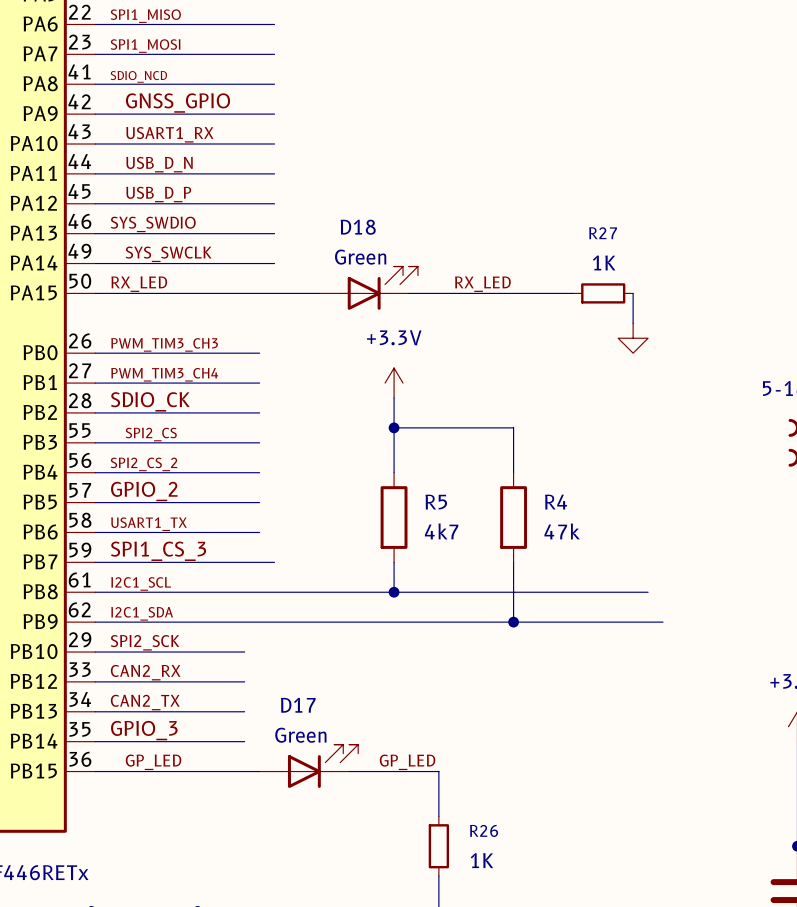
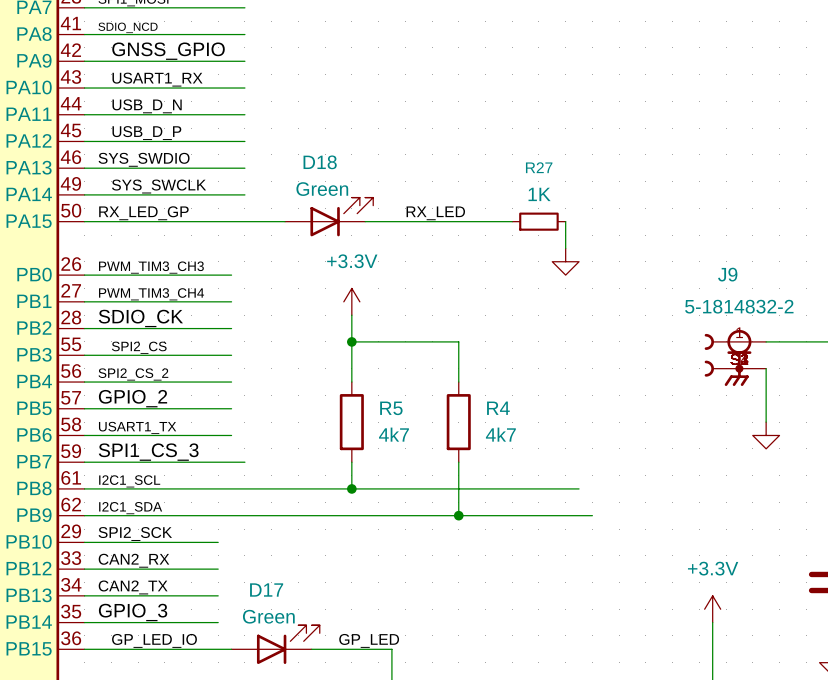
label: RX_LED (139, 284) -> RX_LED_GP (143, 213)
R4 value: 47k (562, 531) -> 4k7 (500, 434)
label: GP_LED (153, 762) -> GP_LED_IO (154, 640)

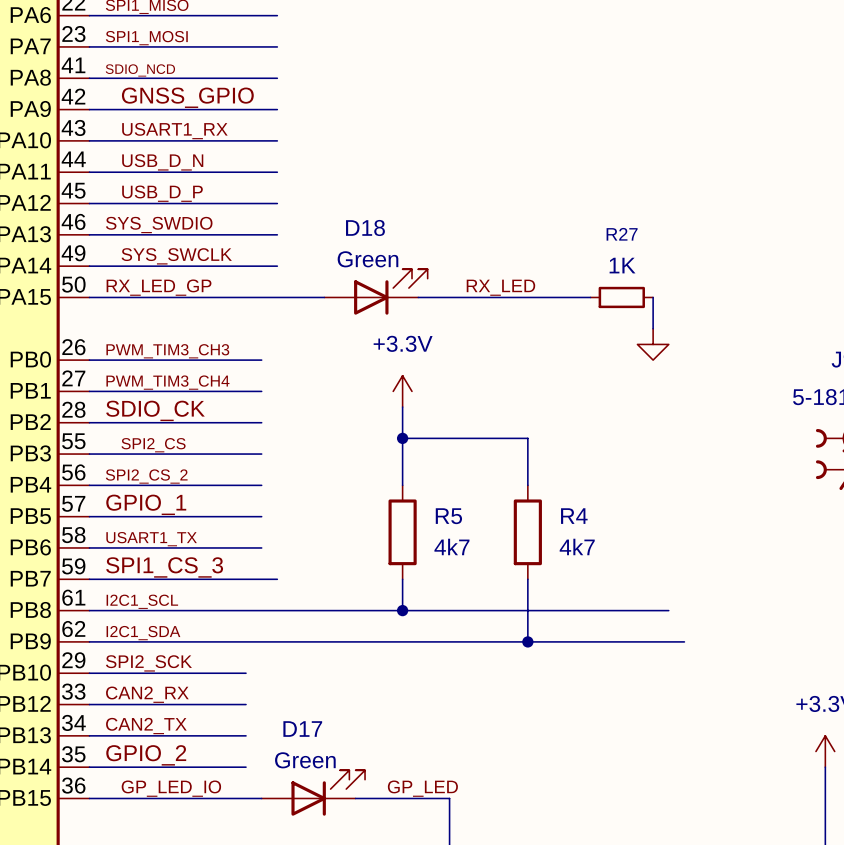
label: GPIO_2 (133, 398) -> GPIO_1 (146, 504)
label: GPIO_3 (133, 612) -> GPIO_2 (146, 755)

